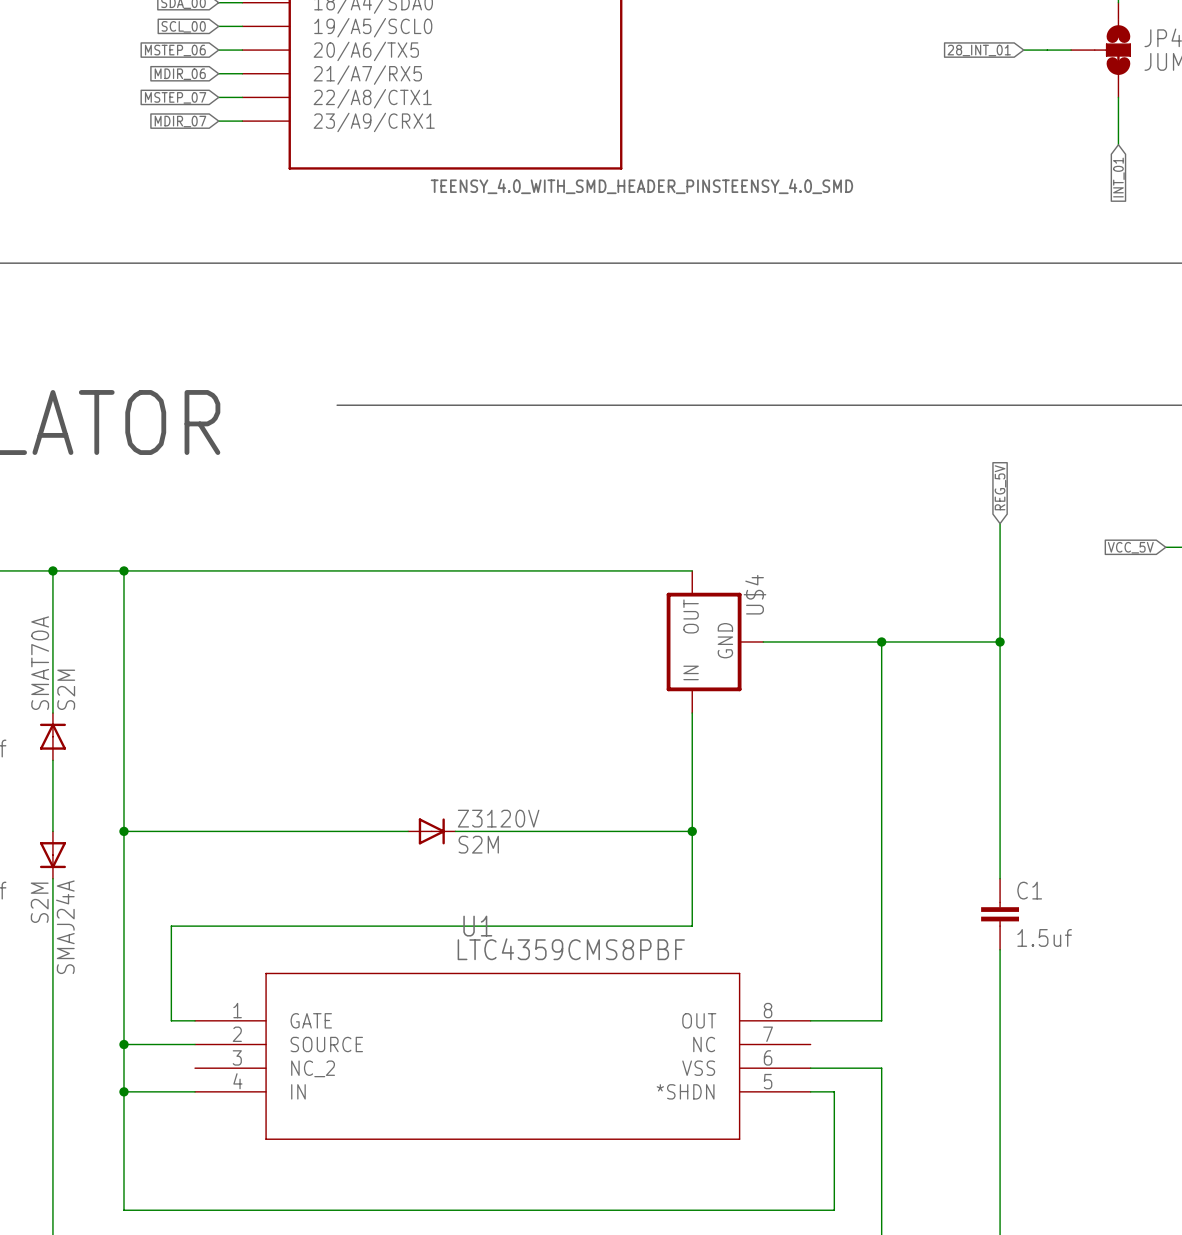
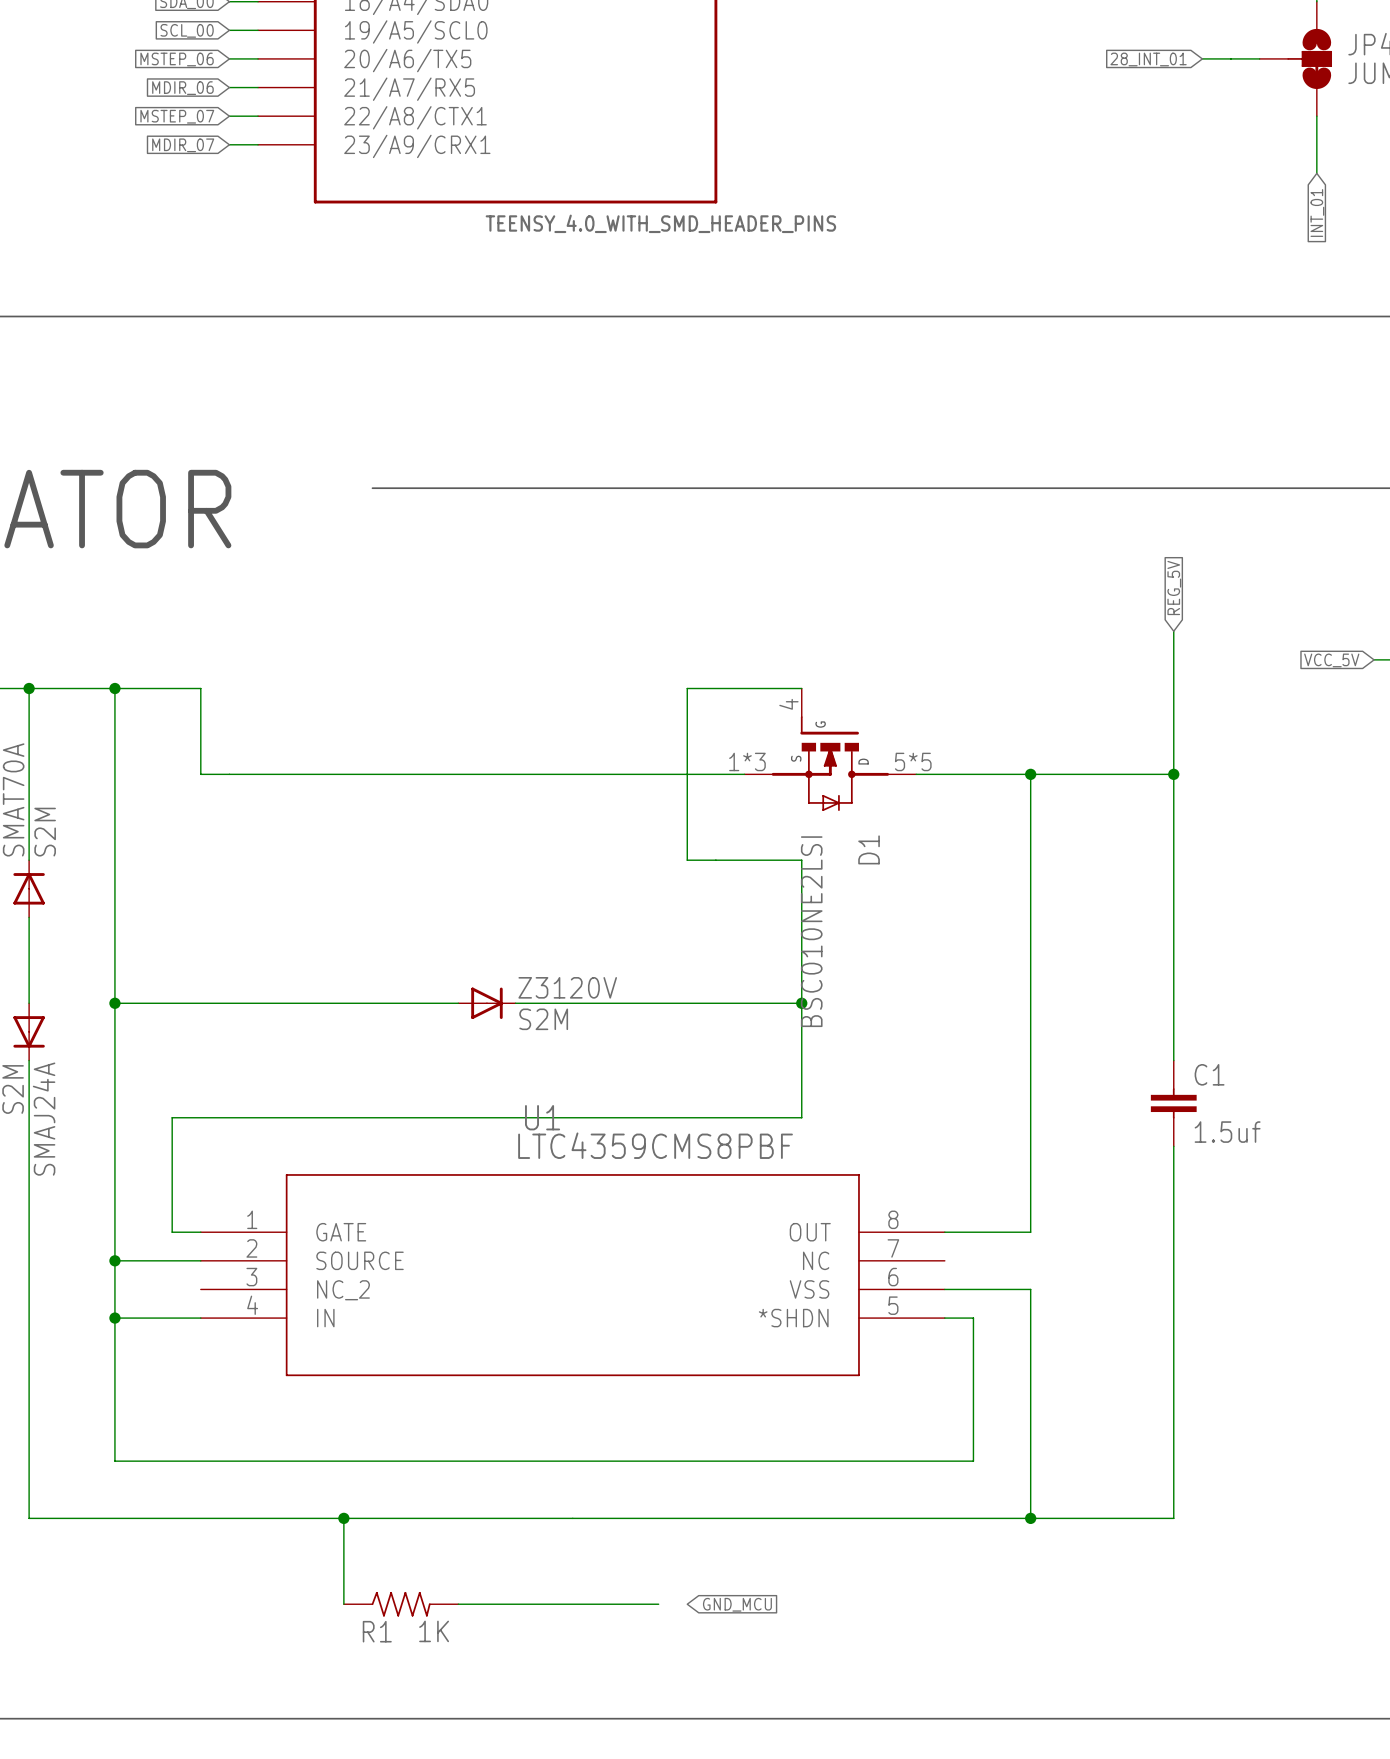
part value: TEENSY_4.0_WITH_SMD_HEADER_PINSTEENSY_4.0_SMD (641, 186) -> TEENSY_4.0_WITH_SMD_HEADER_PINS (660, 223)
wire: (195, 570) (597, 570) -> (200, 688) (200, 774) (744, 774)
wire: none -> (687, 688) (687, 860) (801, 860)
D1: none -> BSC010NE2LSI (830, 749)
U$4: (714, 641) -> none

